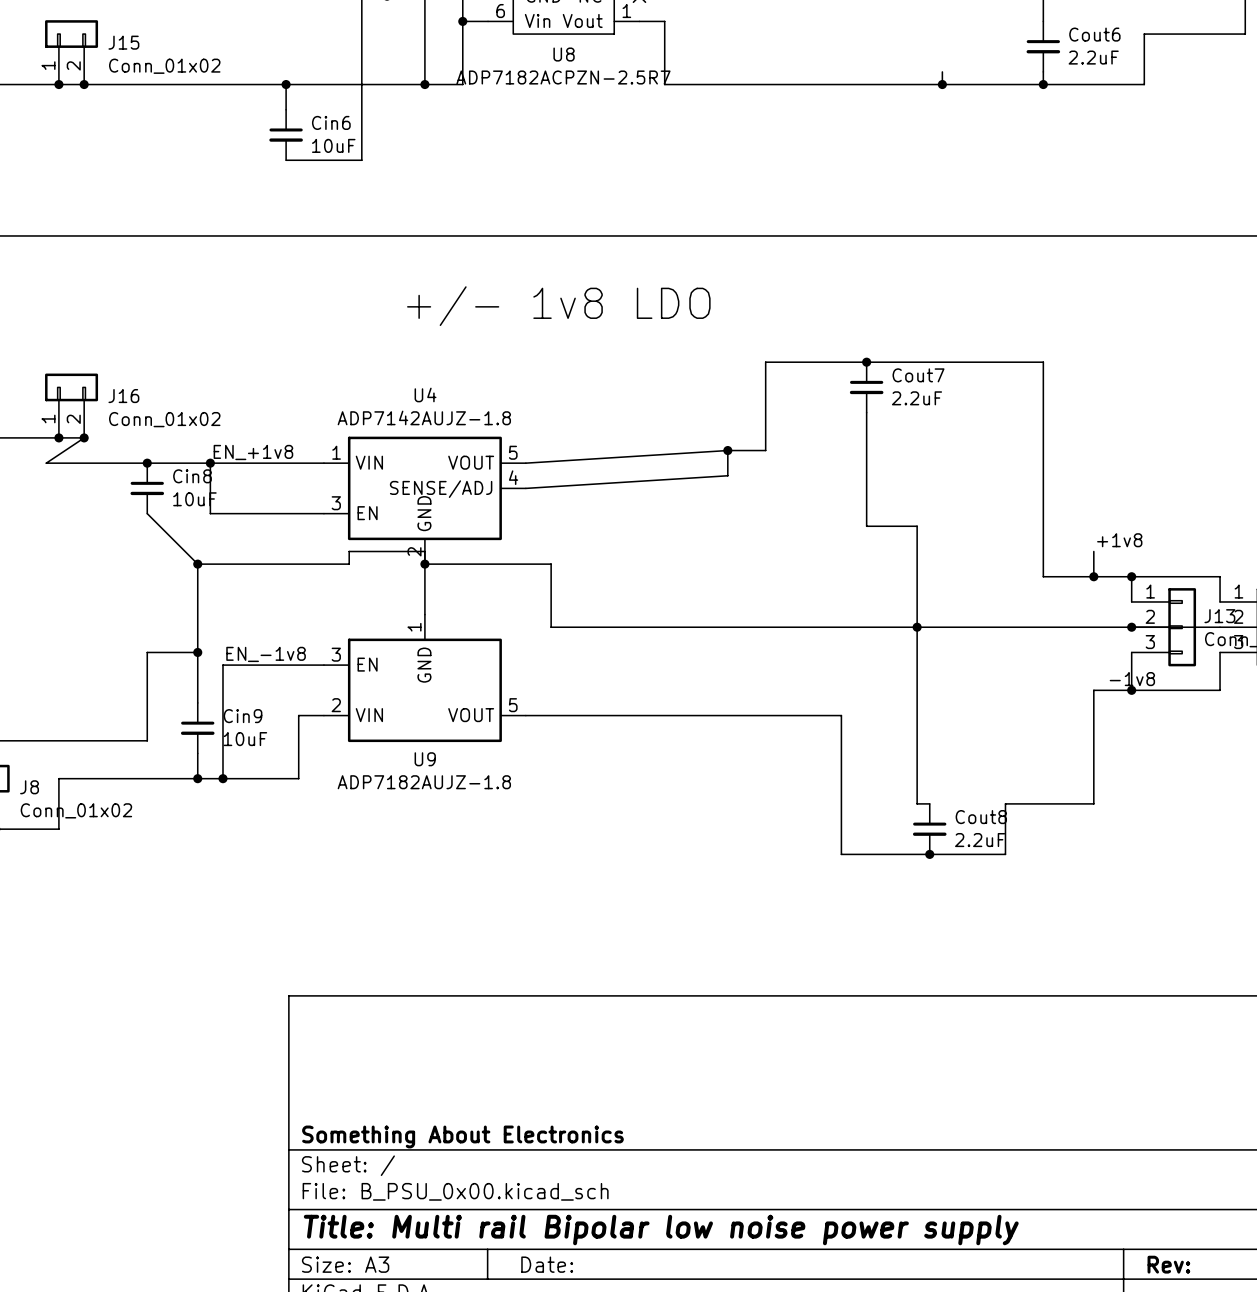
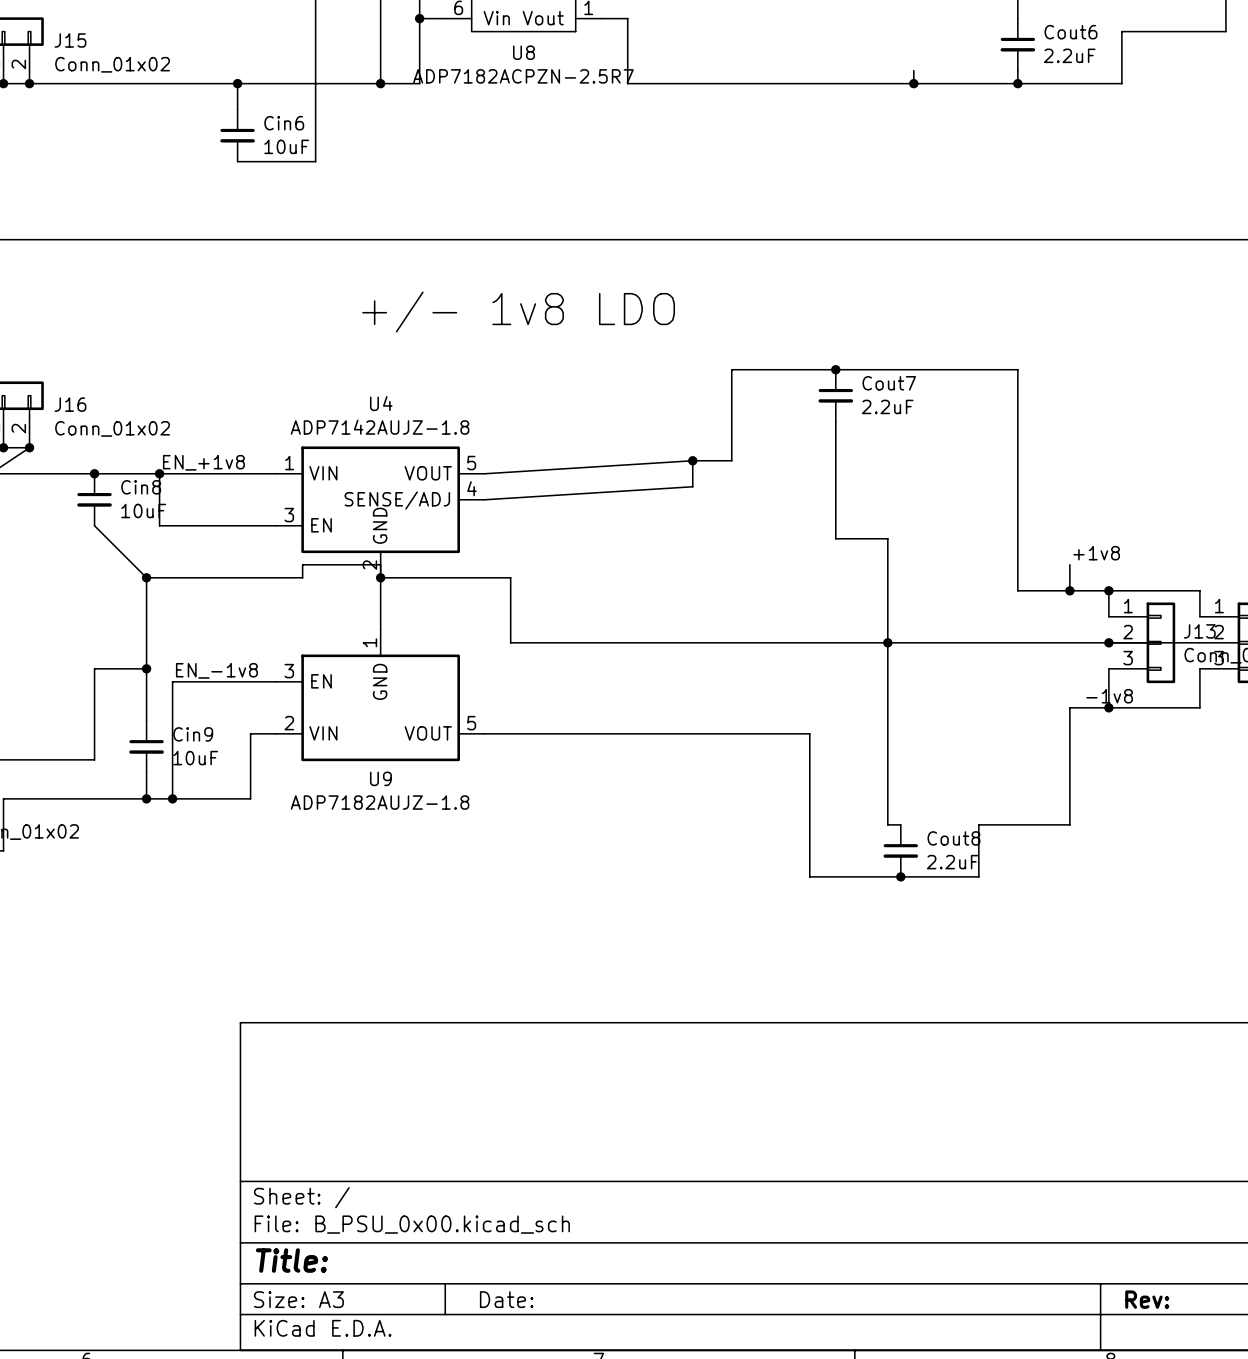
title block: Something About Electronics (462, 1136) -> none
title block: Title: Multi rail Bipolar low noise power supply (661, 1230) -> Title: (291, 1260)

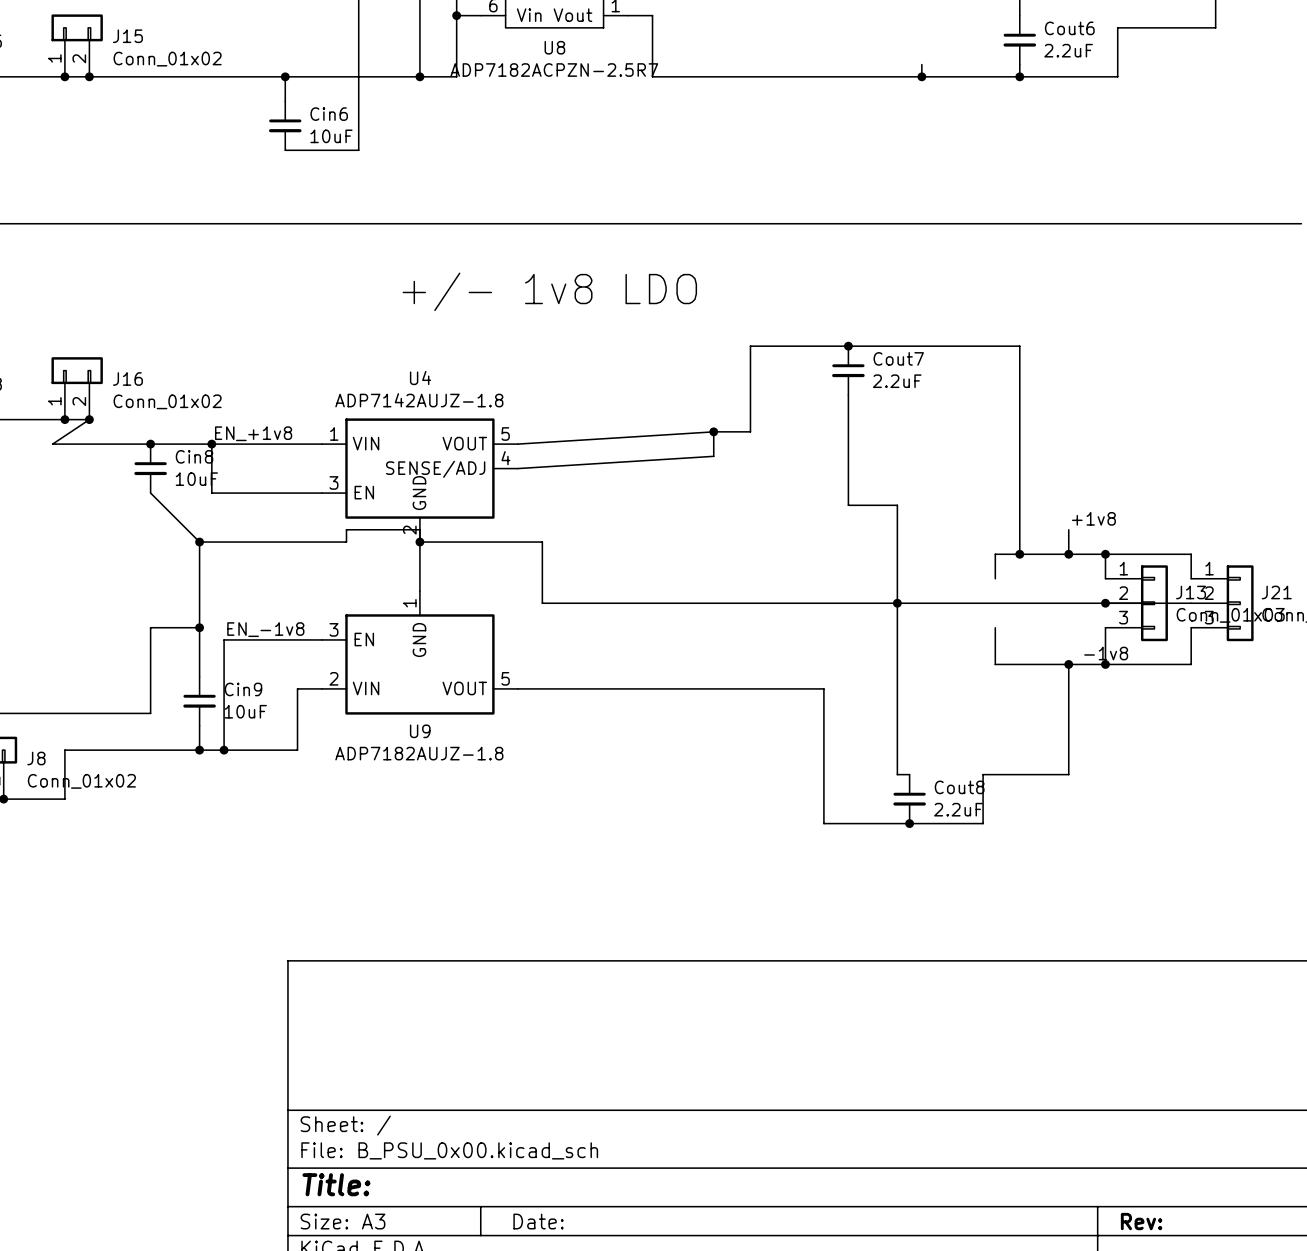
wire: none -> (1019, 554) (995, 554) (995, 578)
junction: none -> (1019, 554)
wire: none -> (995, 627) (995, 664) (1068, 664)
junction: none -> (1068, 664)

